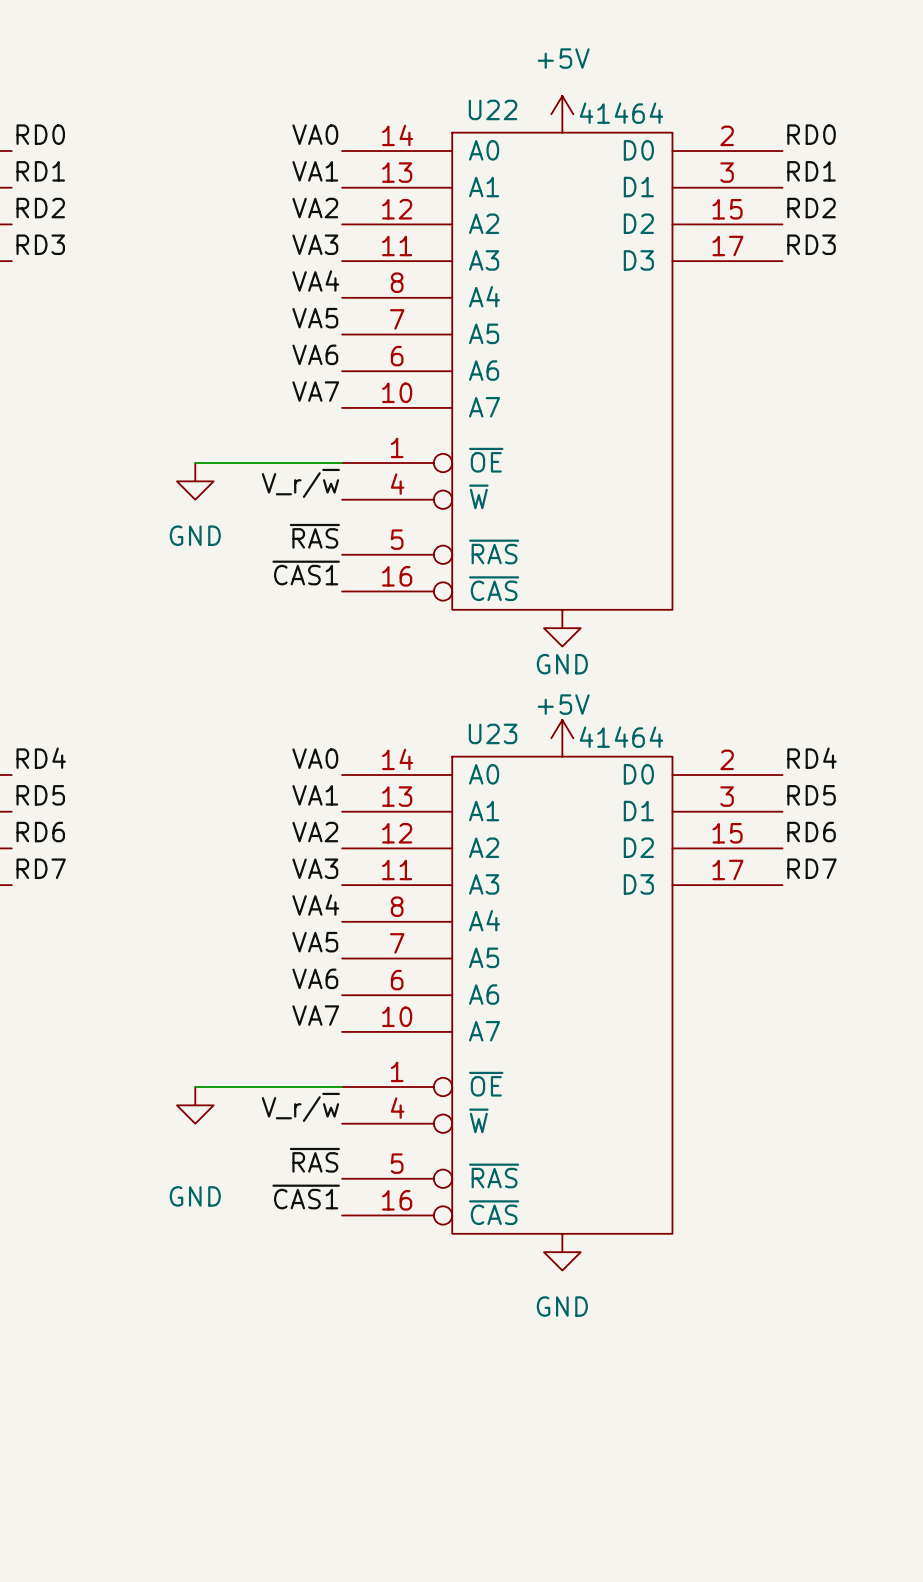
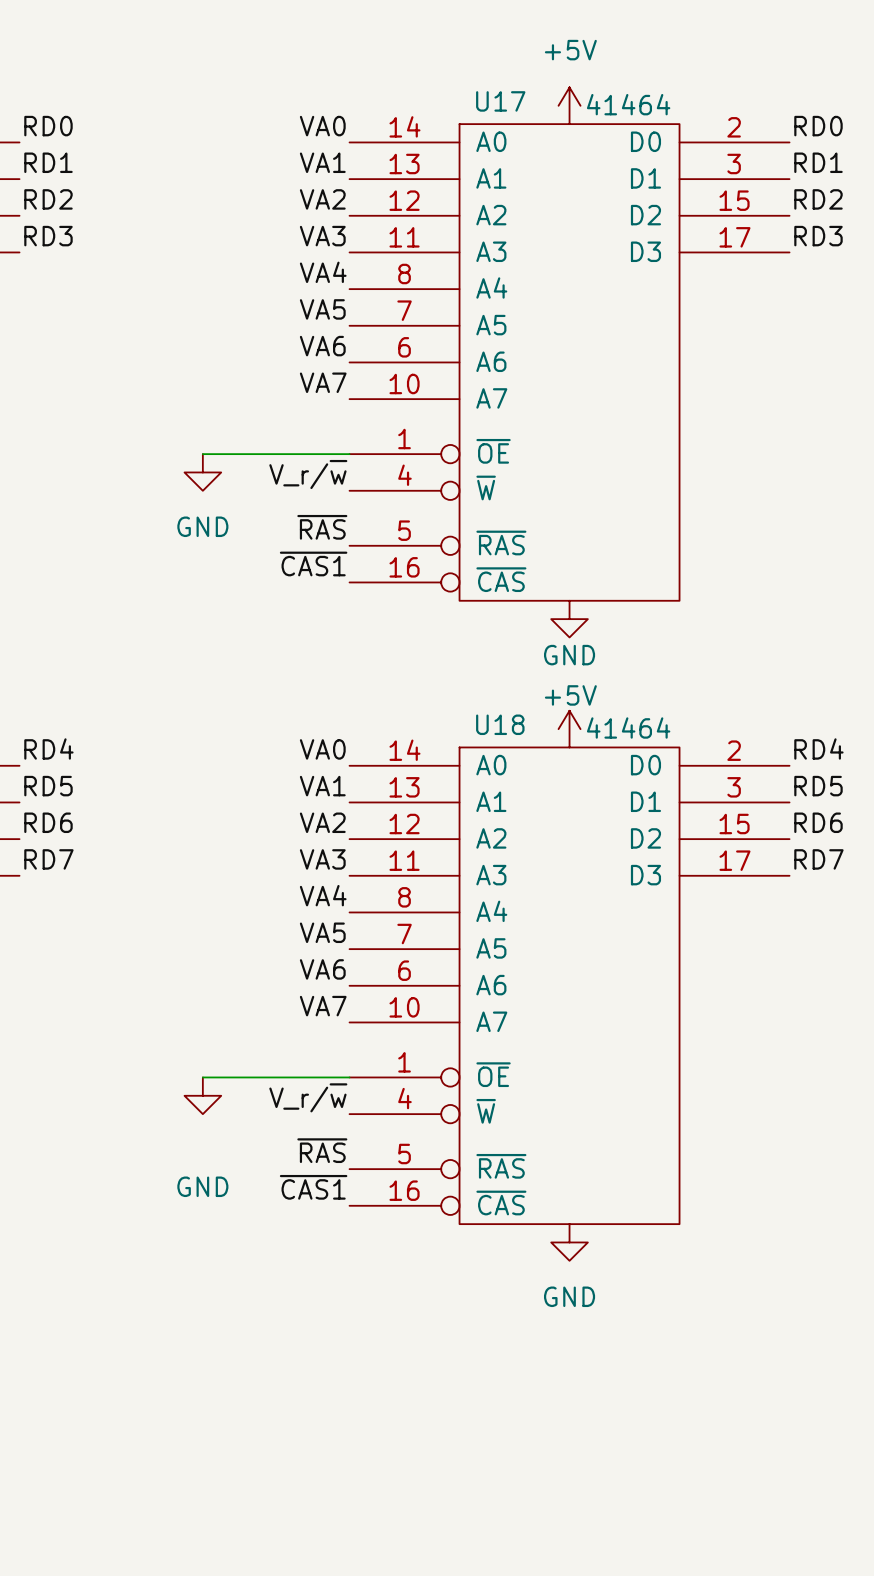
U22 name: U22 (493, 109) -> U17 (500, 101)
U23 name: U23 (493, 733) -> U18 (500, 724)

